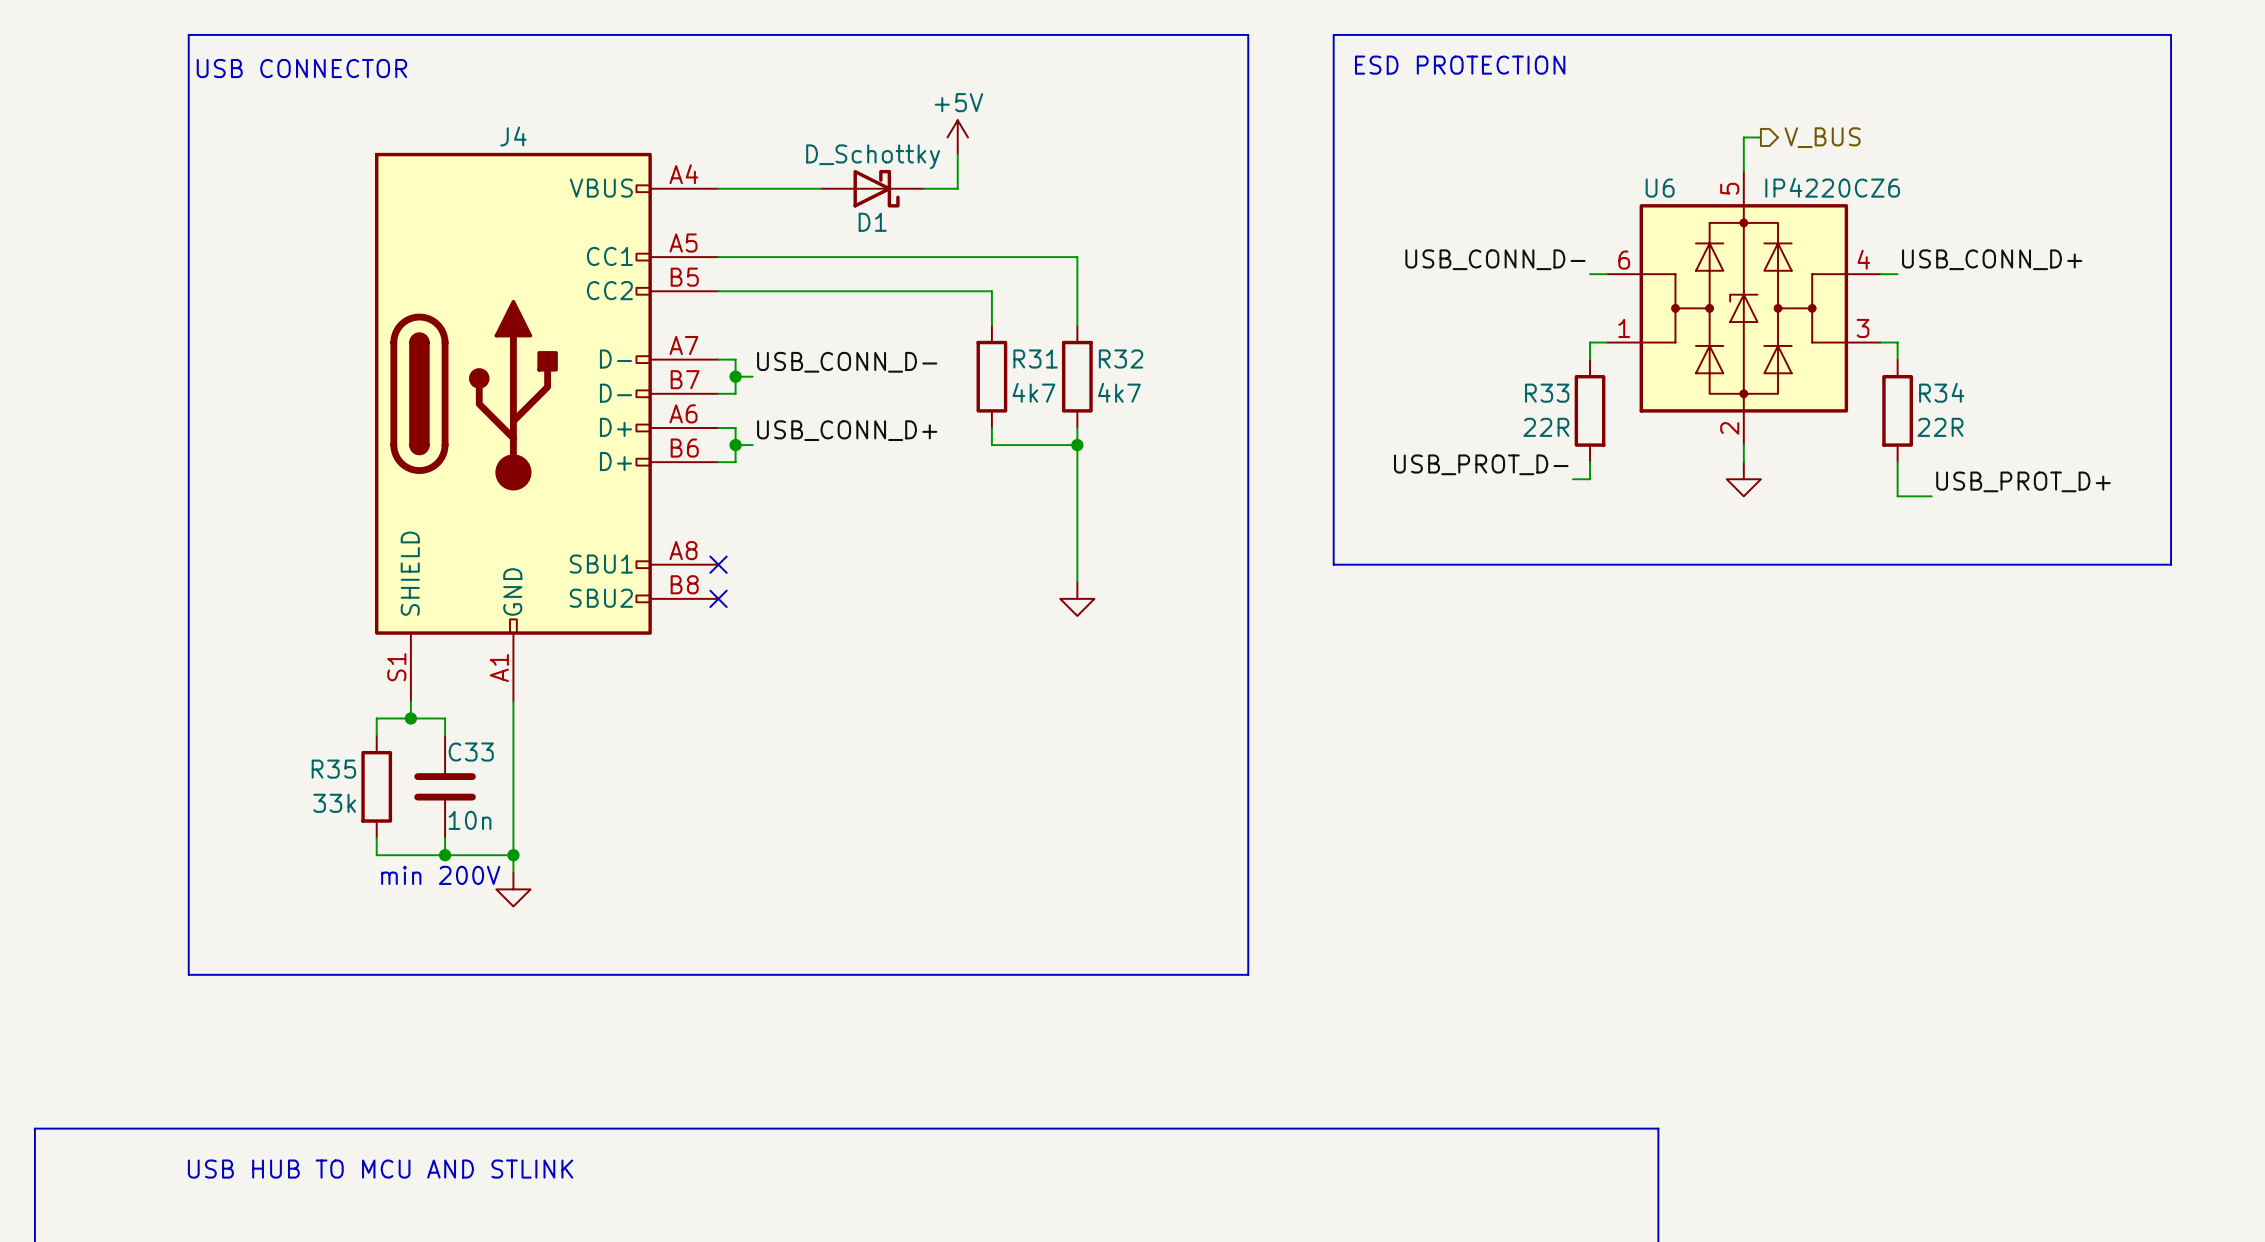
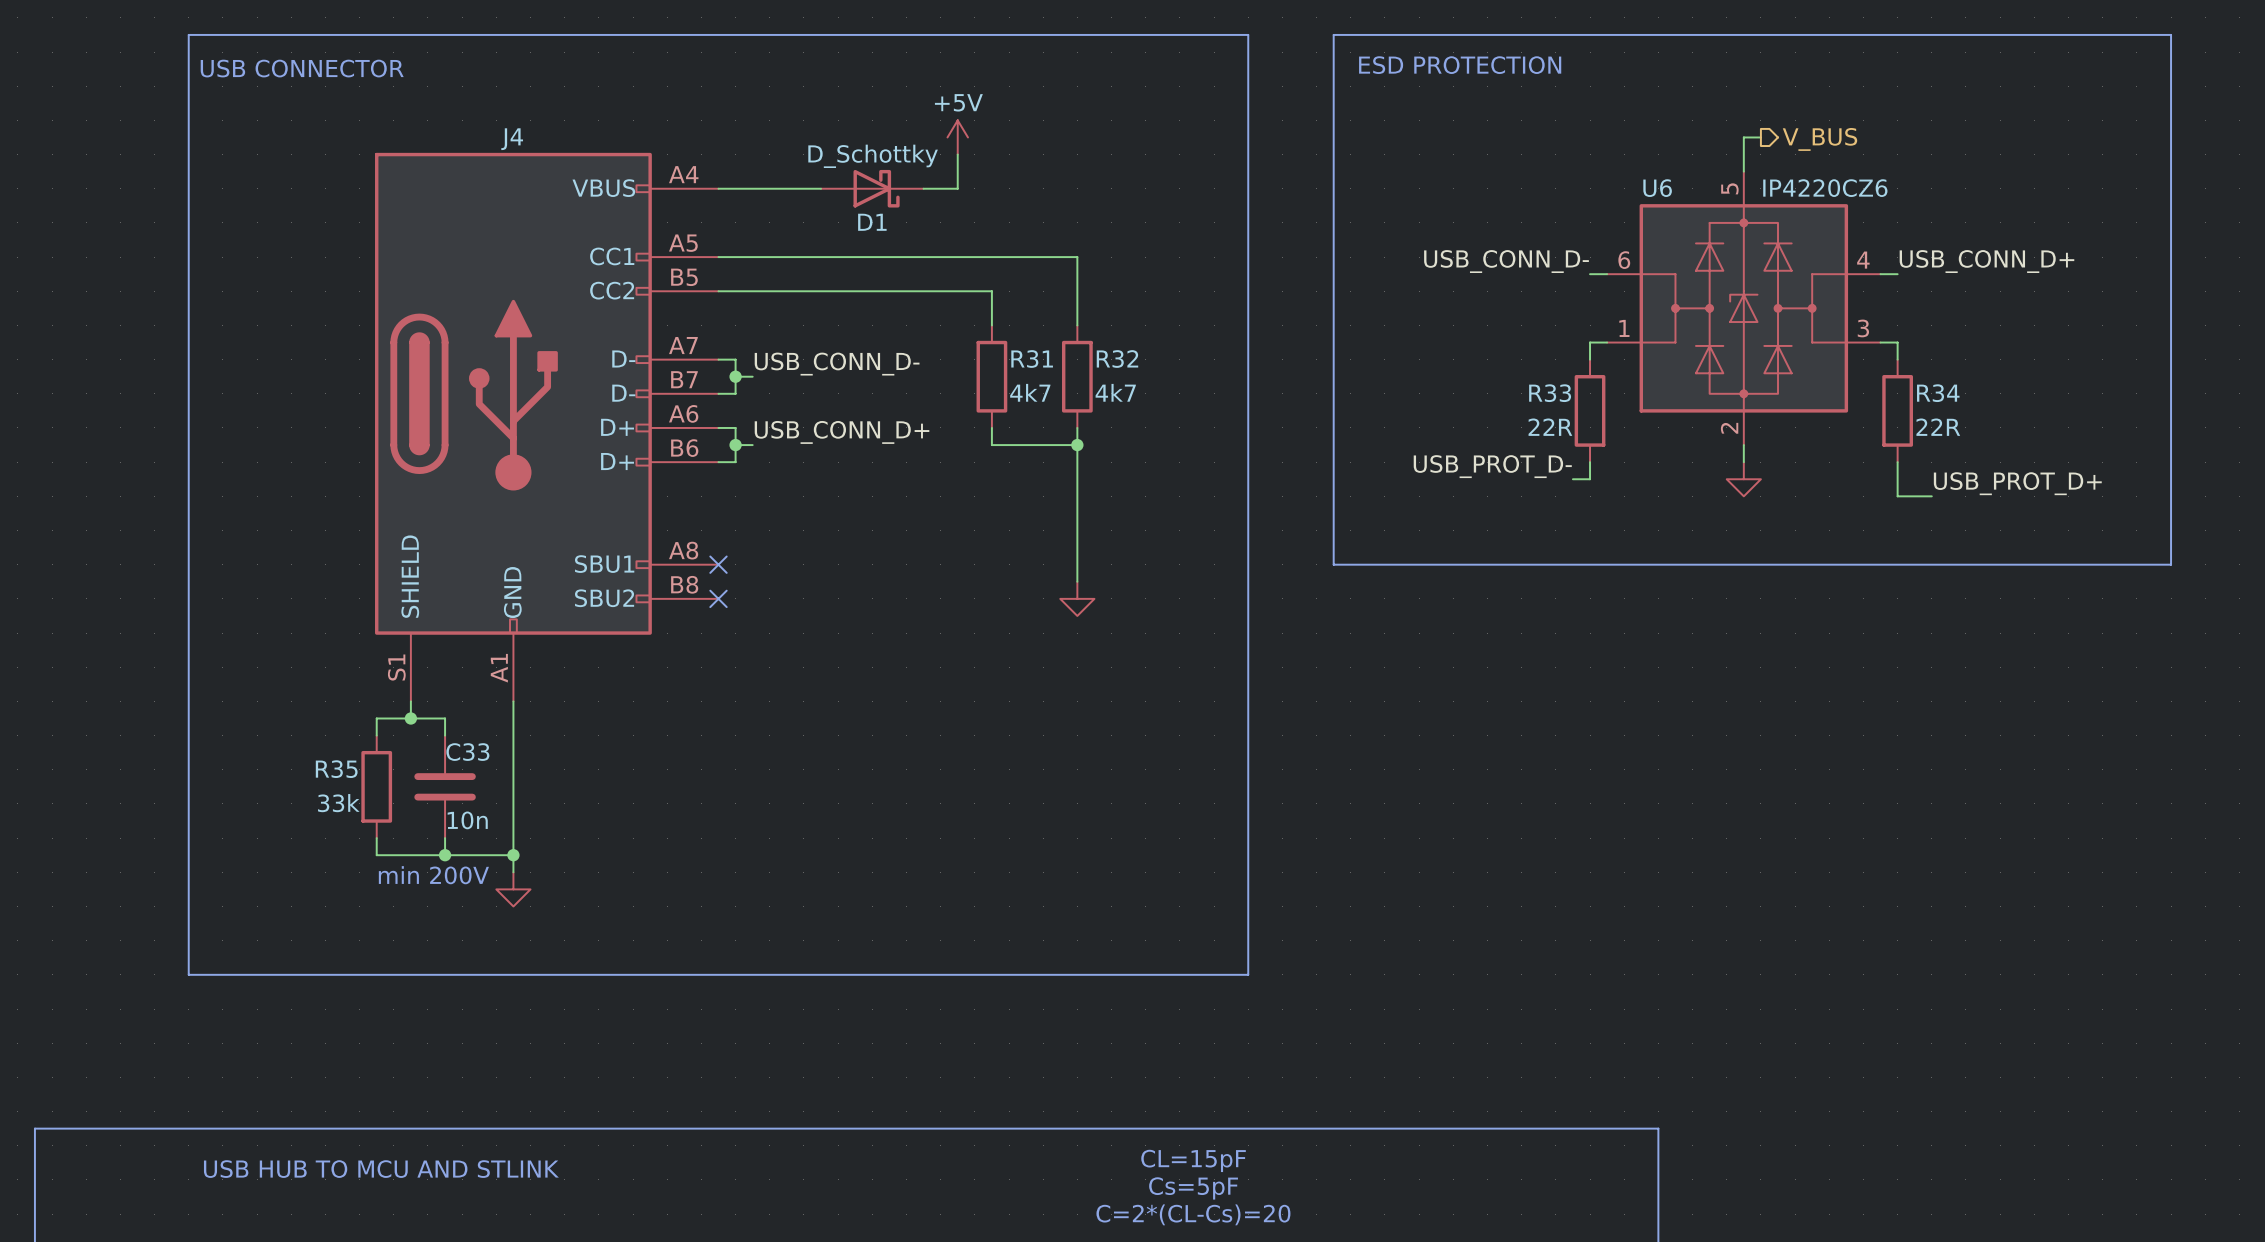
text: none -> CL=15pF (1193, 1160)
text: none -> Cs=5pF (1193, 1188)
text: none -> C=2*(CL-Cs)=20 (1193, 1214)

